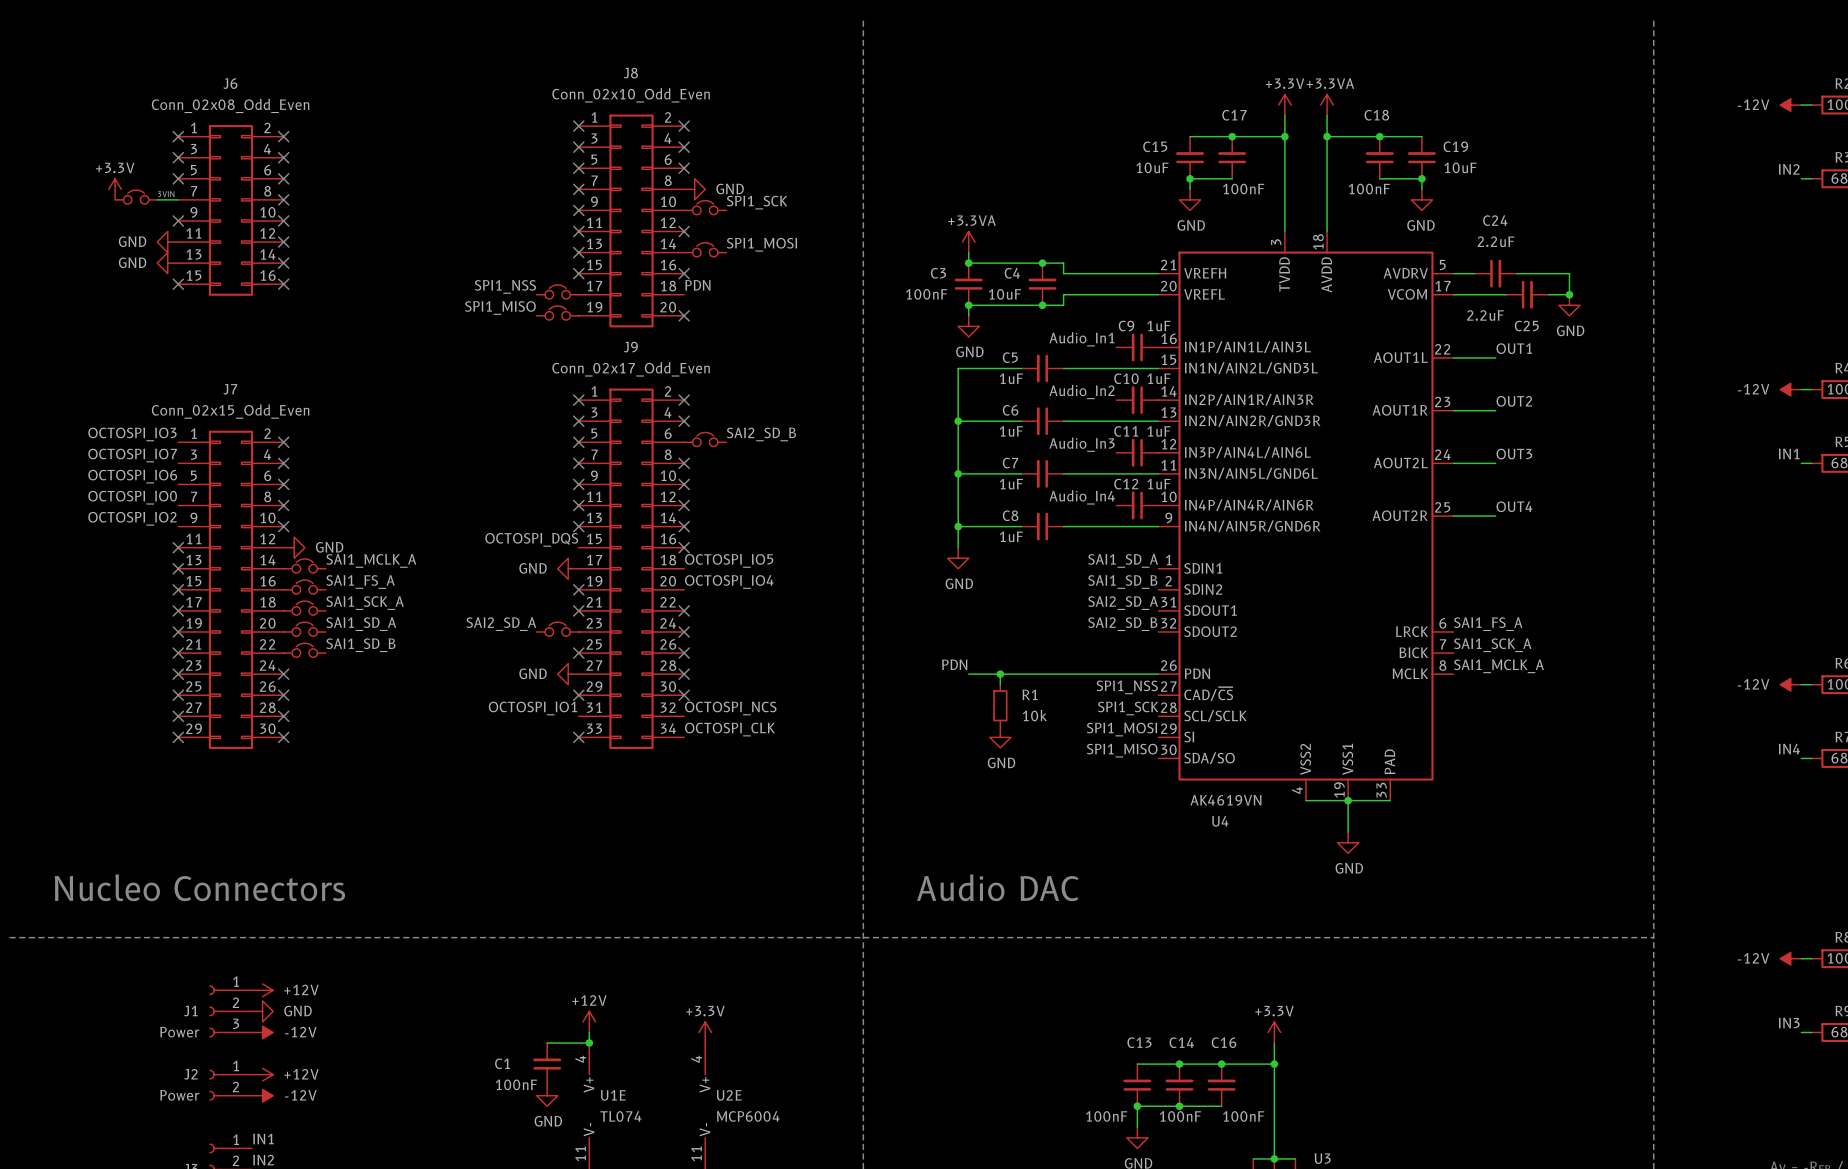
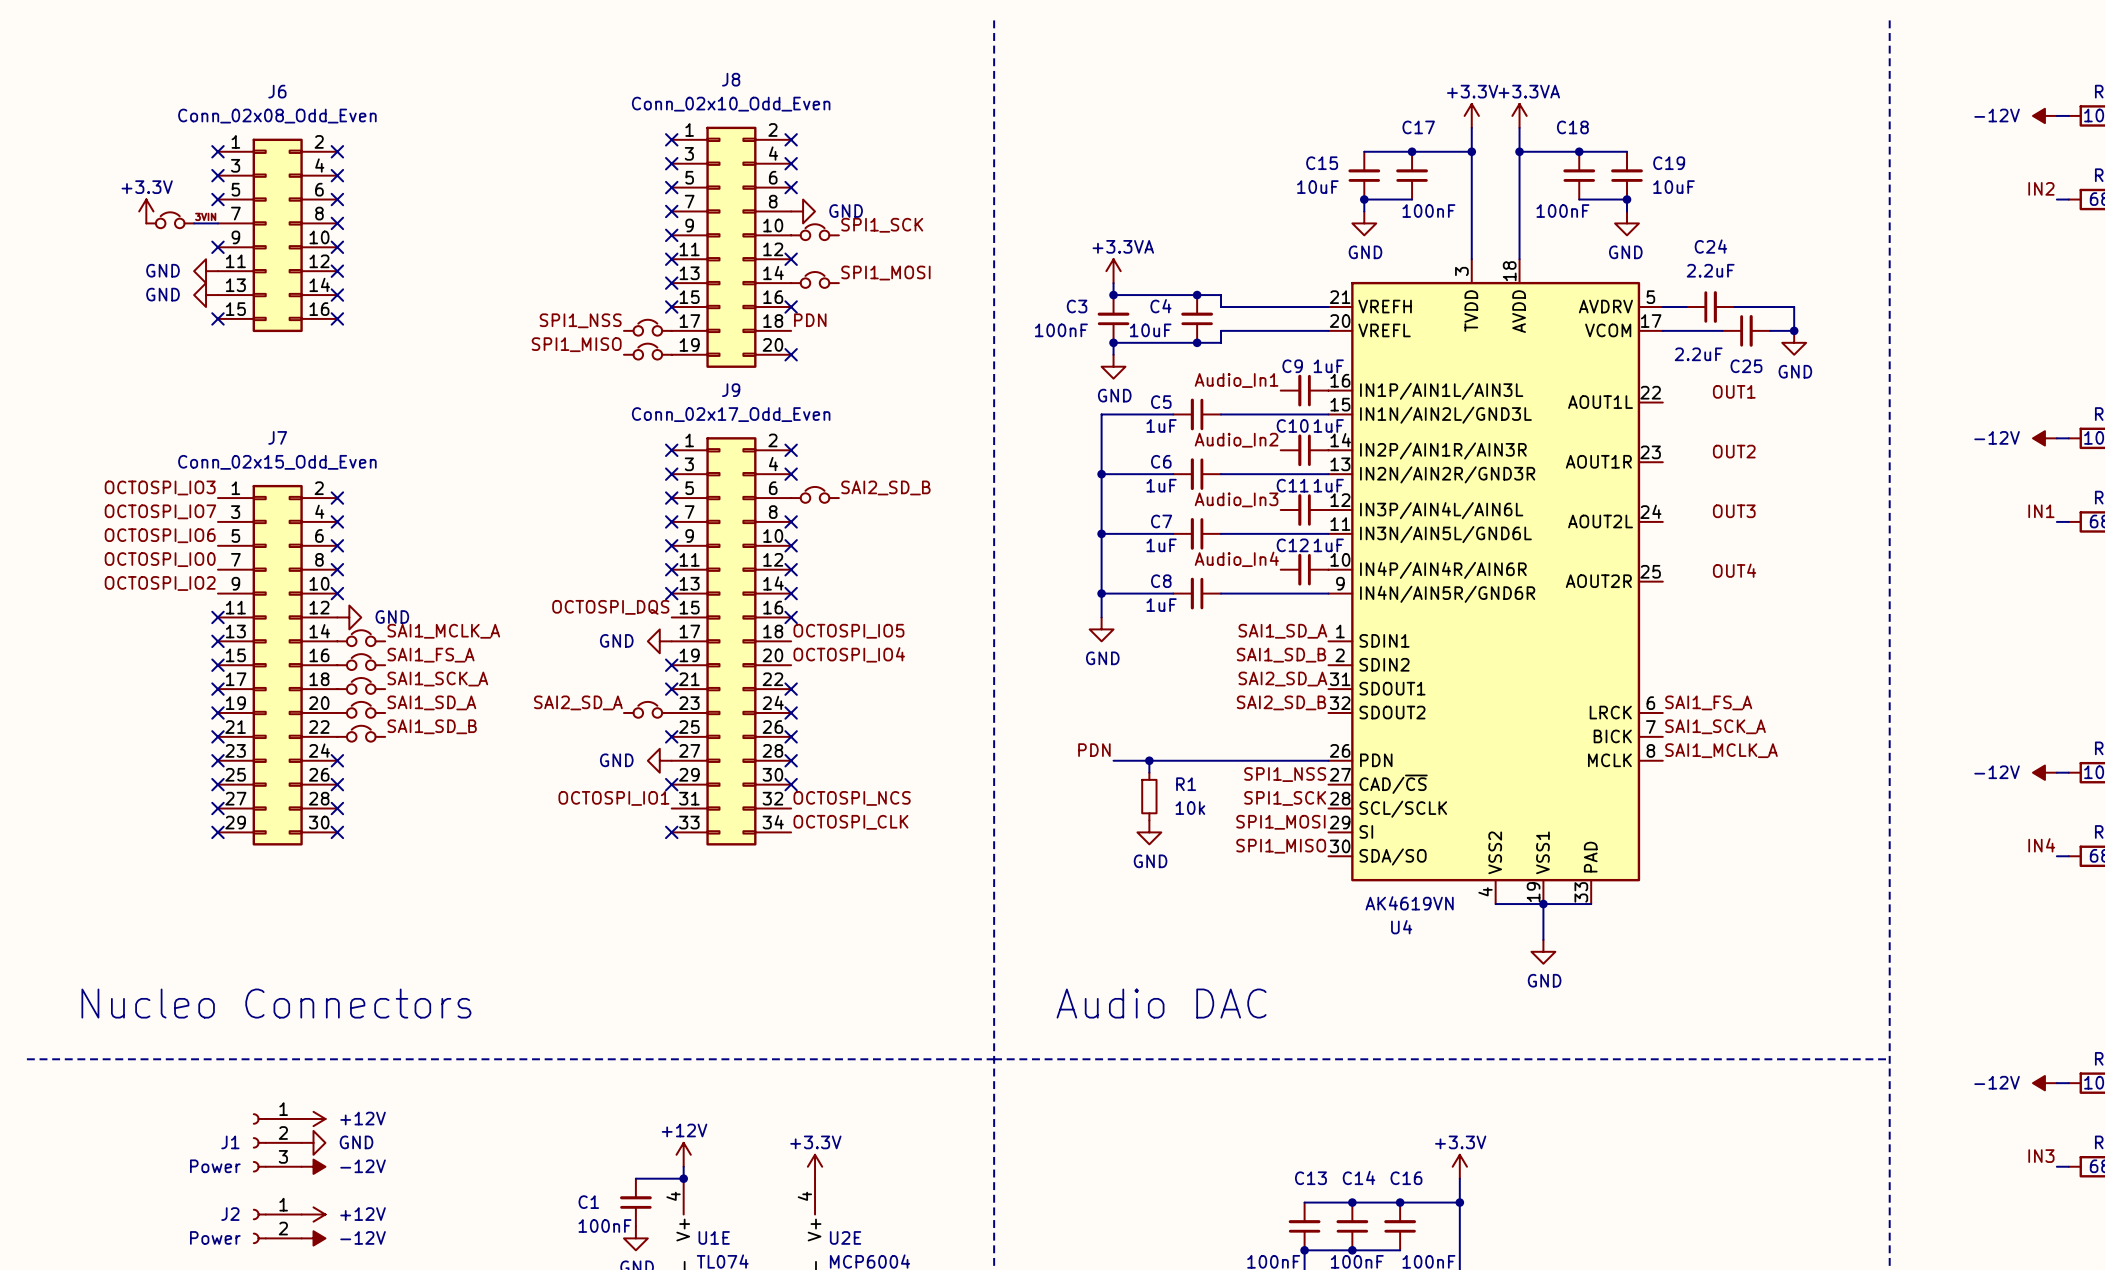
wire: (1453, 357) (1495, 357) -> none
wire: (1453, 410) (1495, 410) -> none
wire: (1453, 463) (1495, 463) -> none
wire: (1453, 516) (1495, 516) -> none

